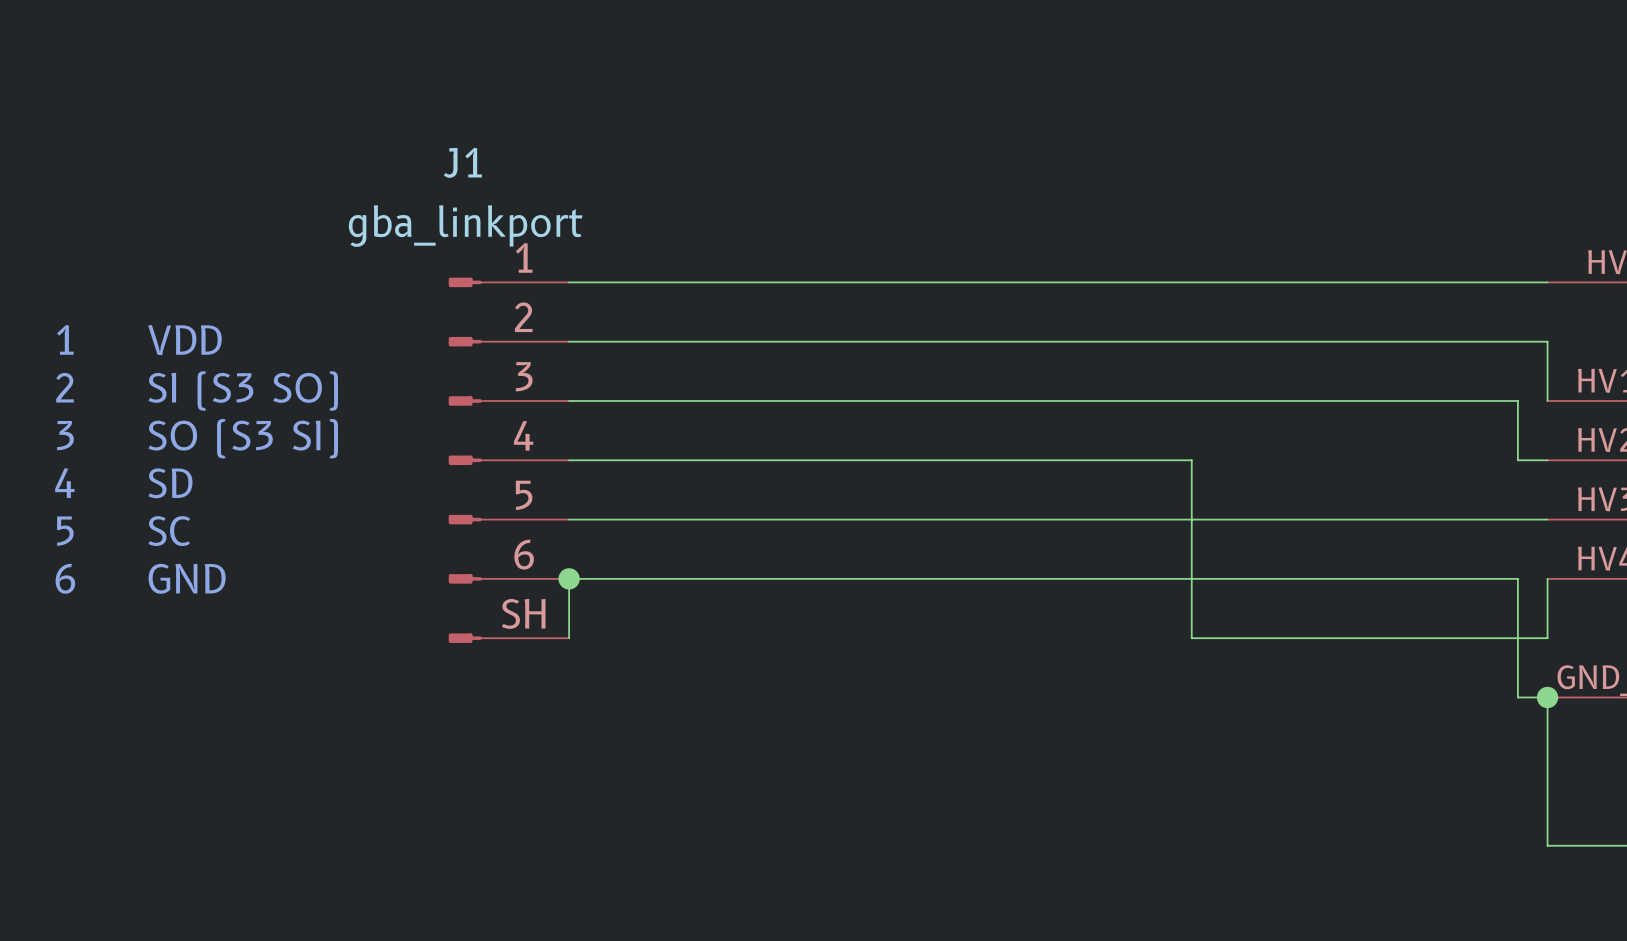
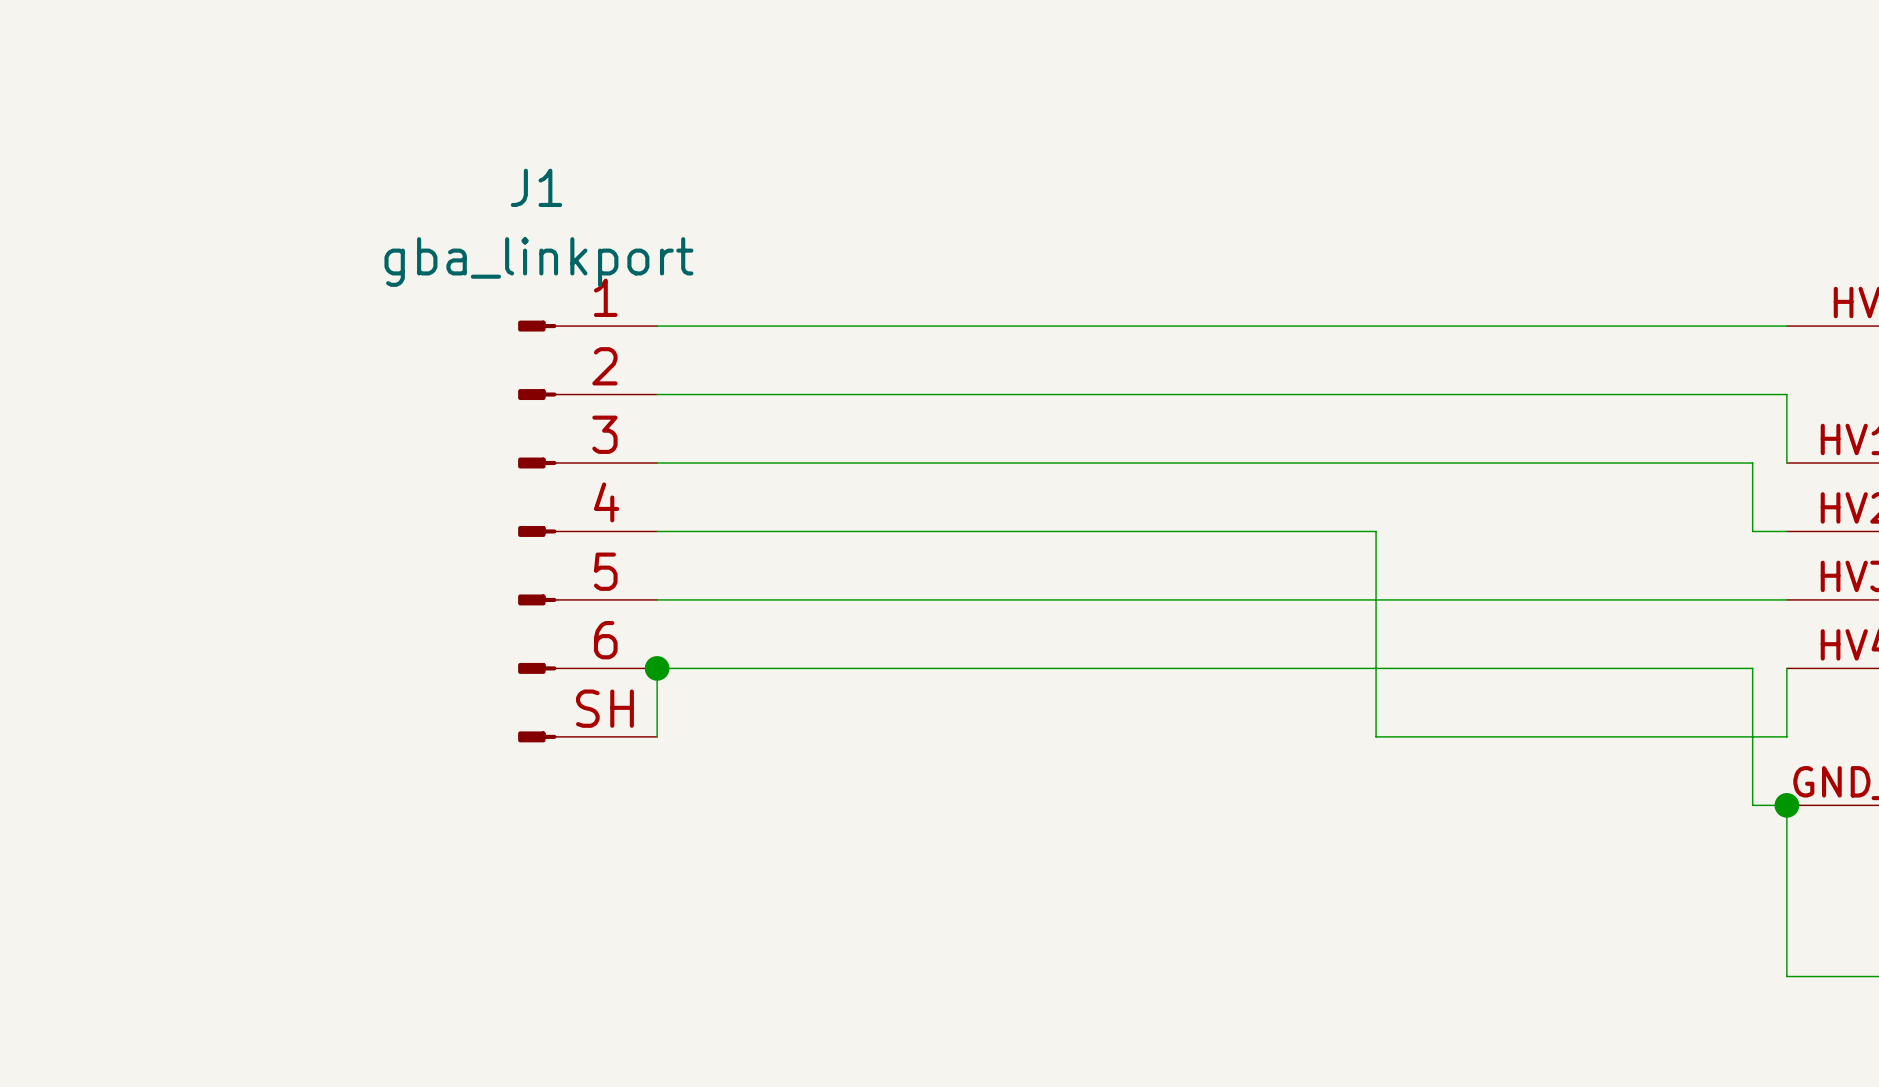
text: 1 VDD (139, 340) -> none
text: 2 SI (S3 SO) (197, 390) -> none
text: 3 SO (S3 SI) (197, 438) -> none
text: 4 SD (123, 483) -> none
text: 5 SC (123, 531) -> none
text: 6 GND (140, 578) -> none

